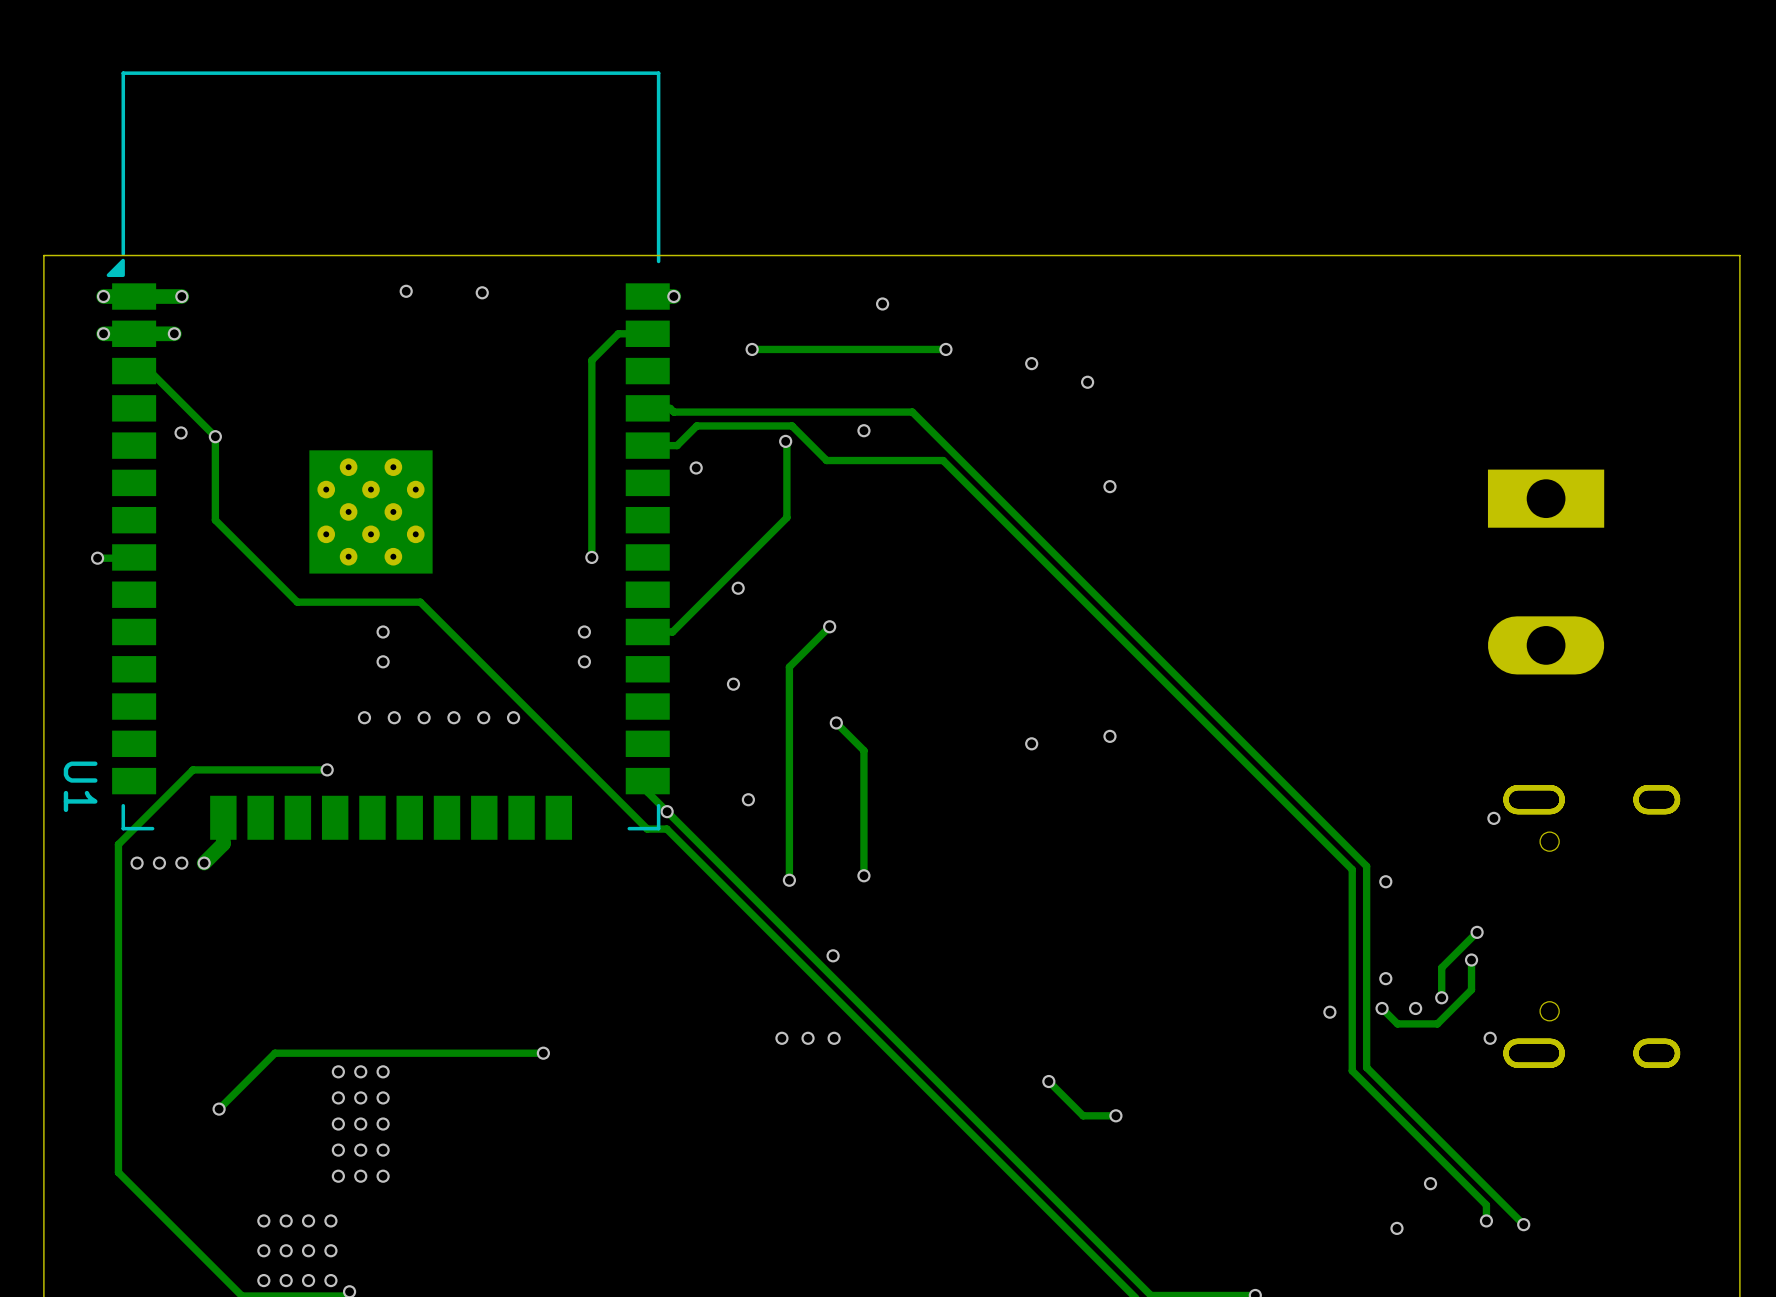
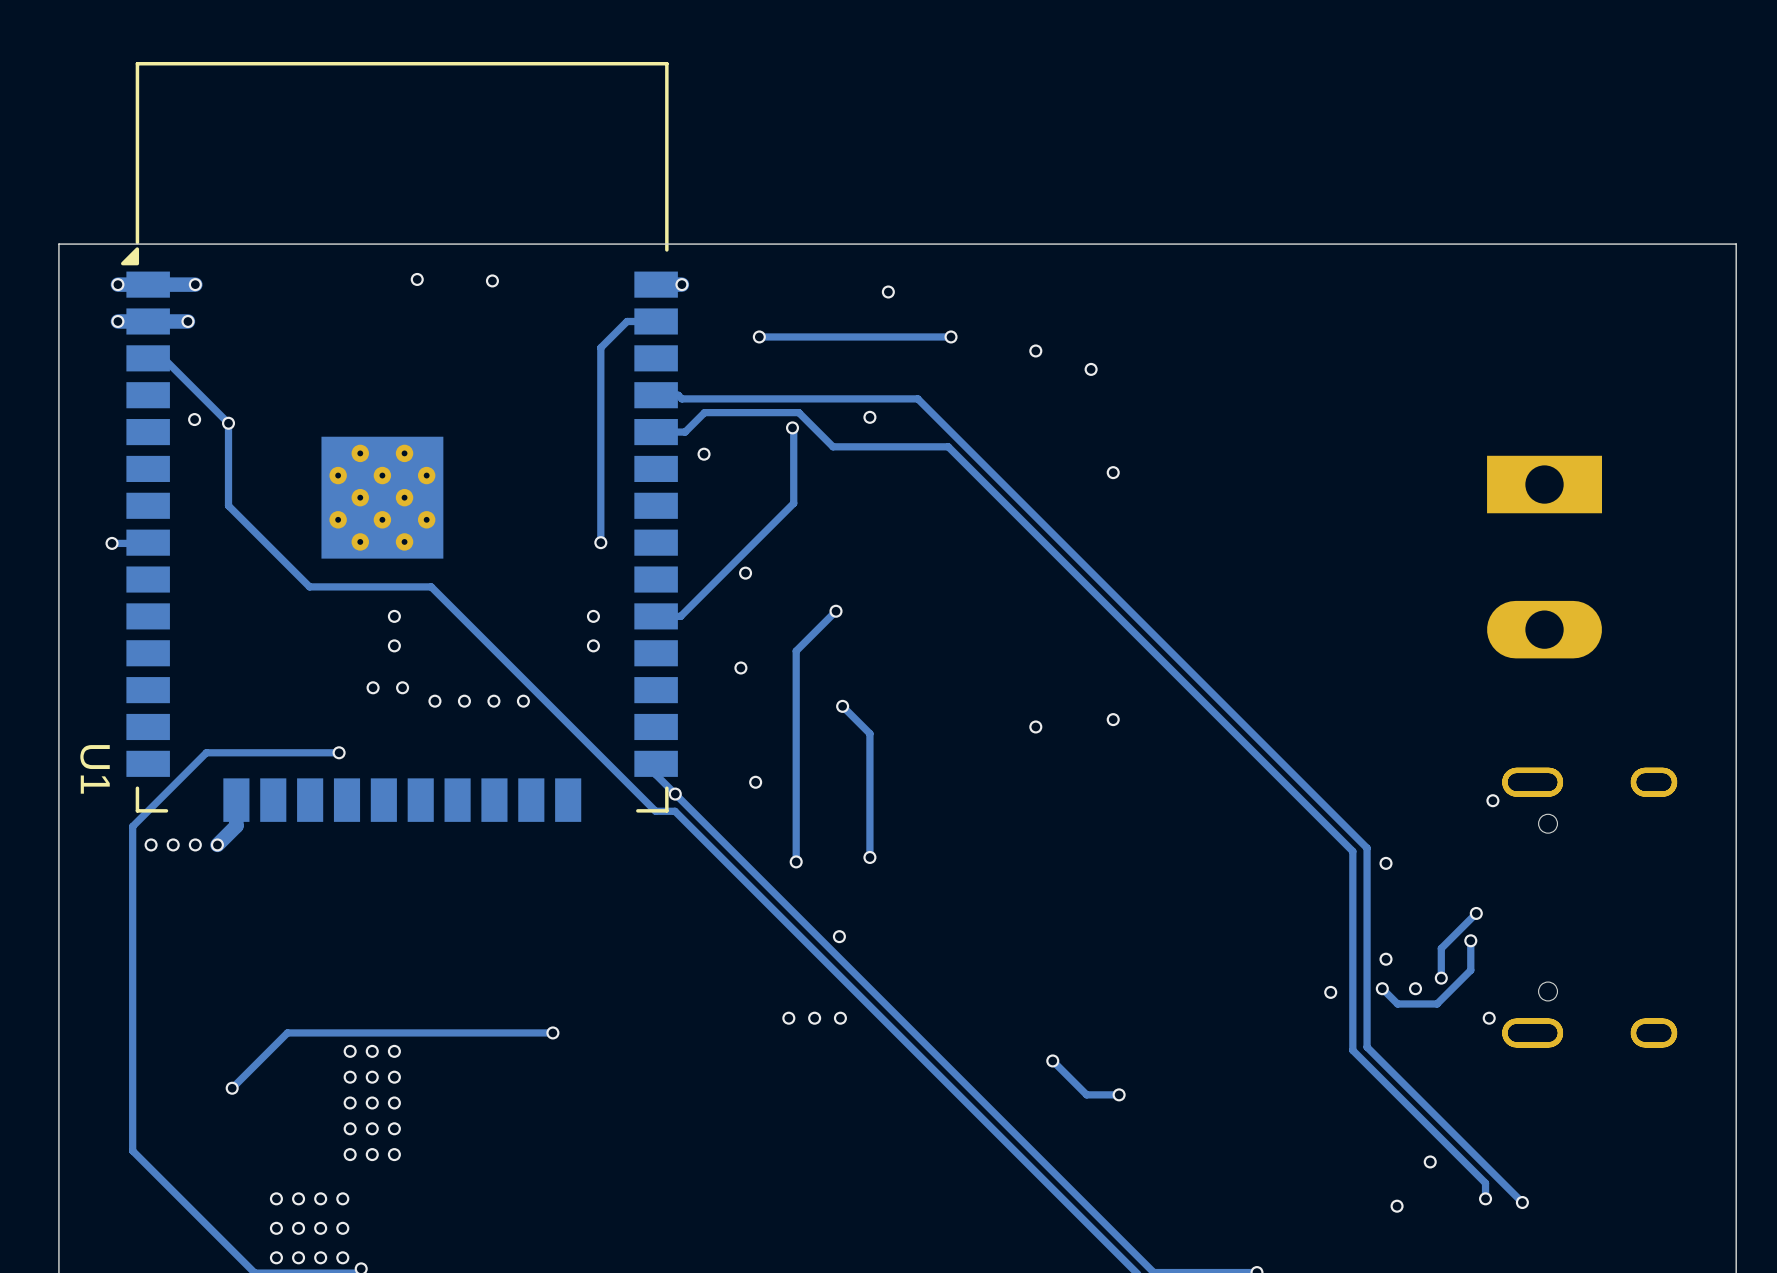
via position: (364, 717) -> (373, 687)
via position: (394, 717) -> (402, 687)

